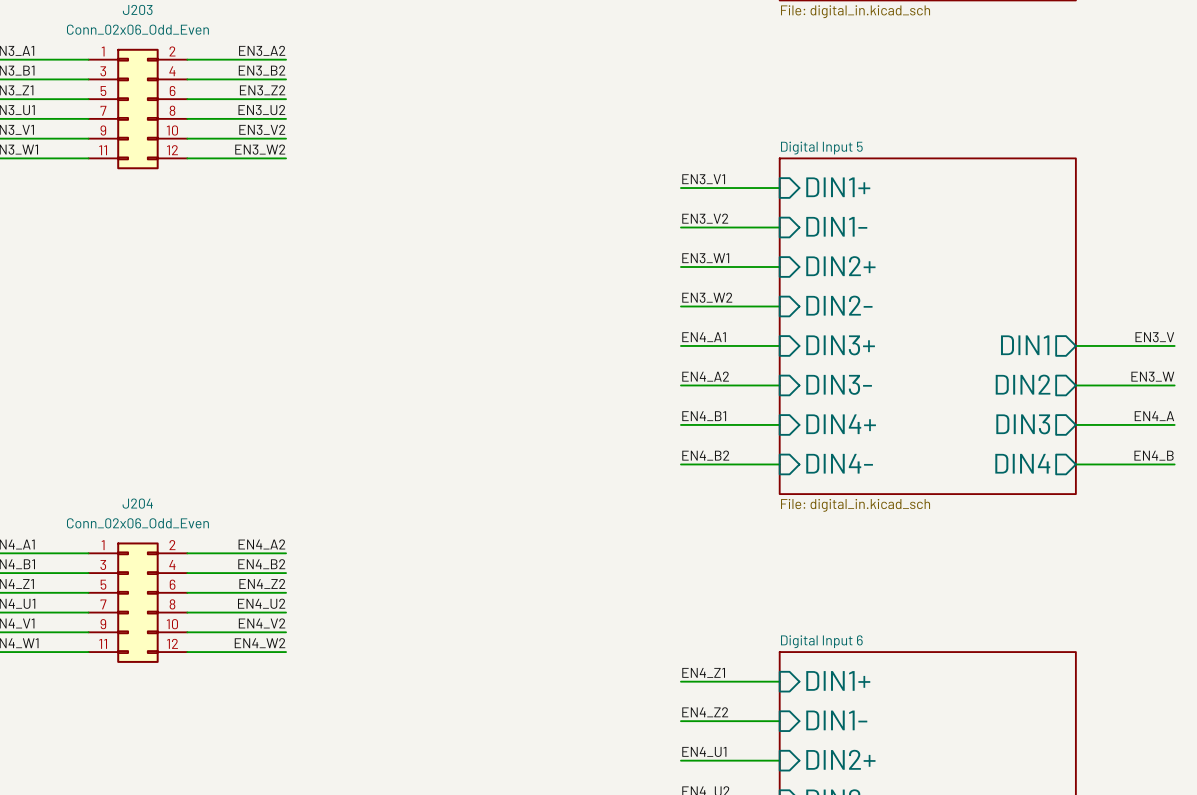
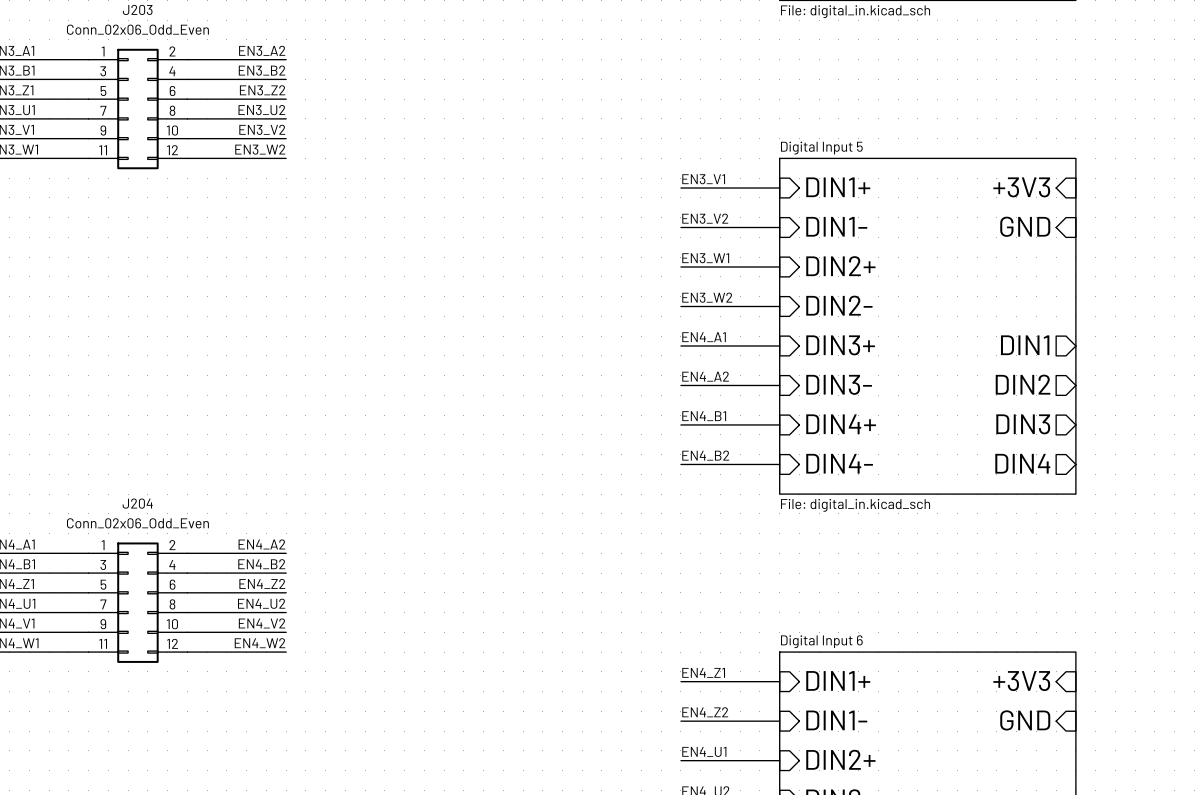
sheet pin: none -> +3V3 (1021, 187)
sheet pin: none -> GND (1025, 226)
label: EN3_V (1154, 337) -> none
wire: (1075, 345) (1174, 345) -> none
label: EN3_W (1152, 376) -> none
wire: (1075, 385) (1174, 385) -> none
label: EN4_A (1154, 416) -> none
wire: (1075, 424) (1174, 424) -> none
label: EN4_B (1154, 455) -> none
wire: (1075, 464) (1174, 464) -> none
sheet pin: none -> +3V3 (1021, 681)
sheet pin: none -> GND (1025, 720)

